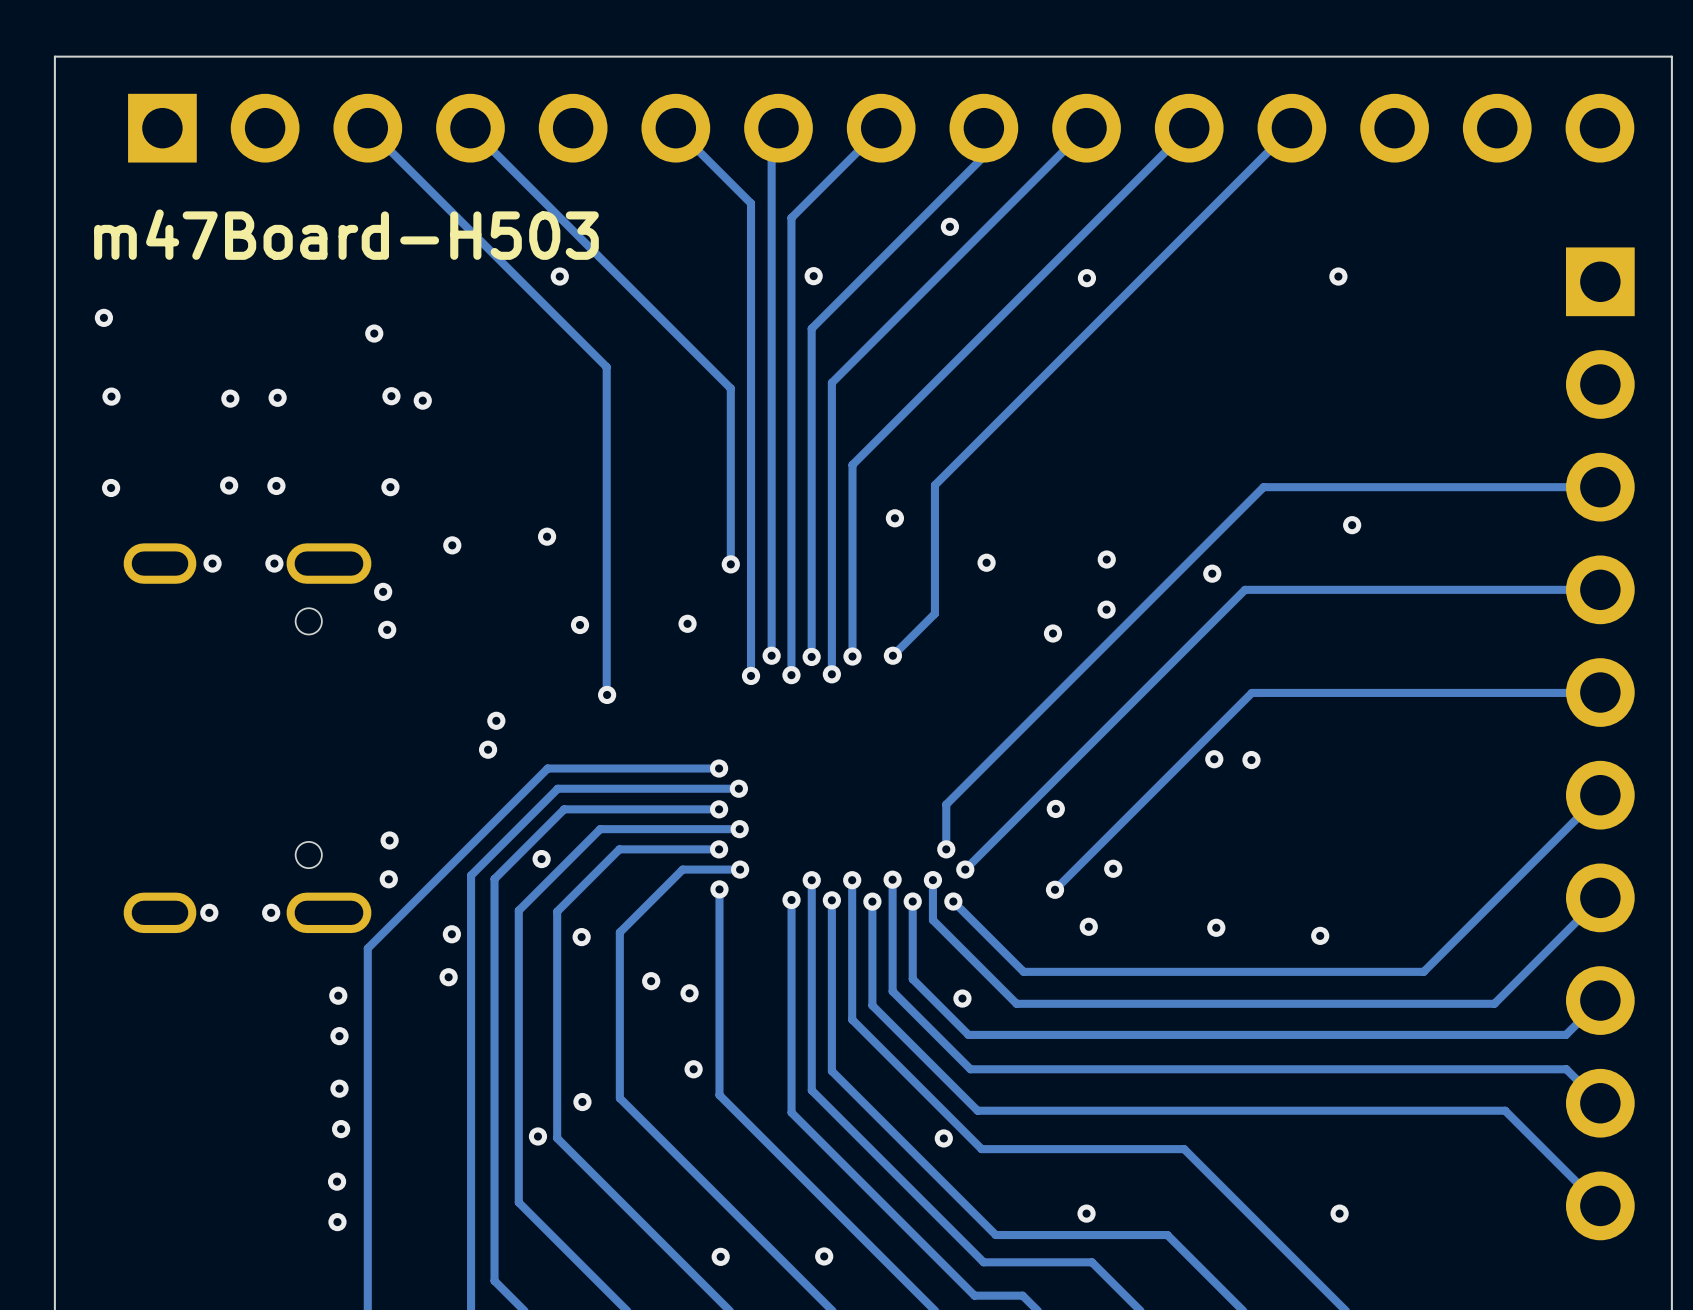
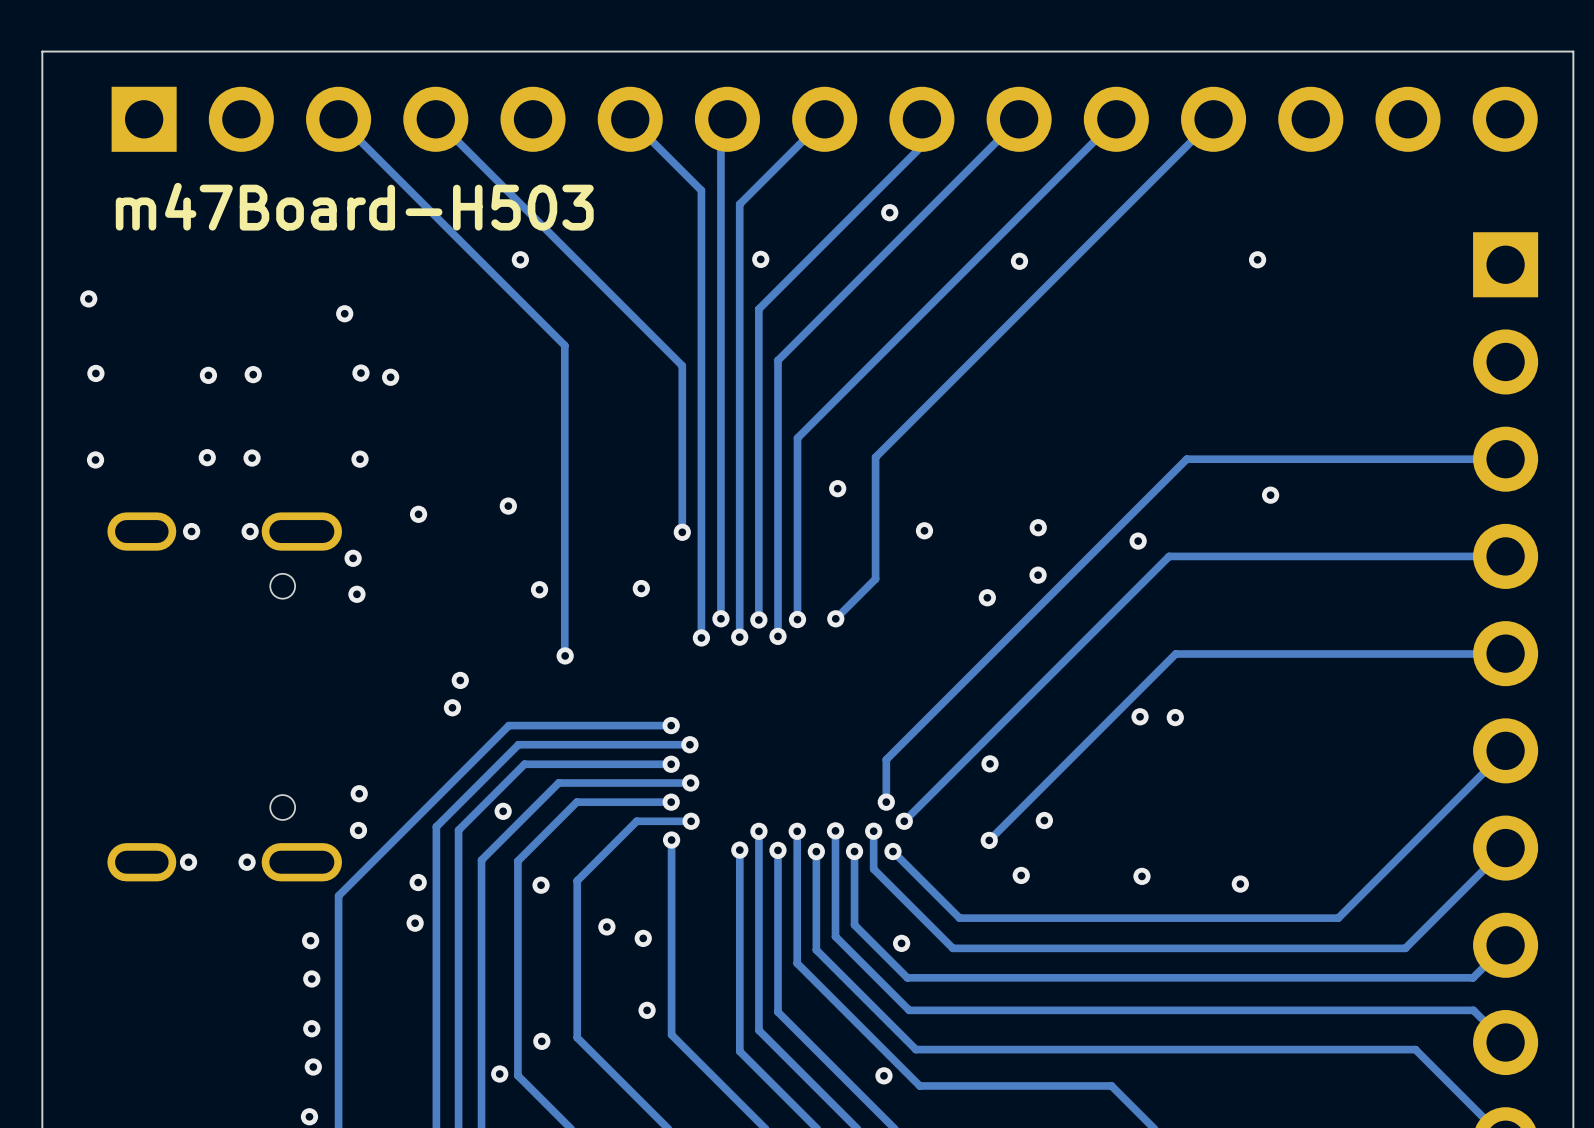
text position: m47Board-H503 (346, 234) -> m47Board-H503 (354, 206)

